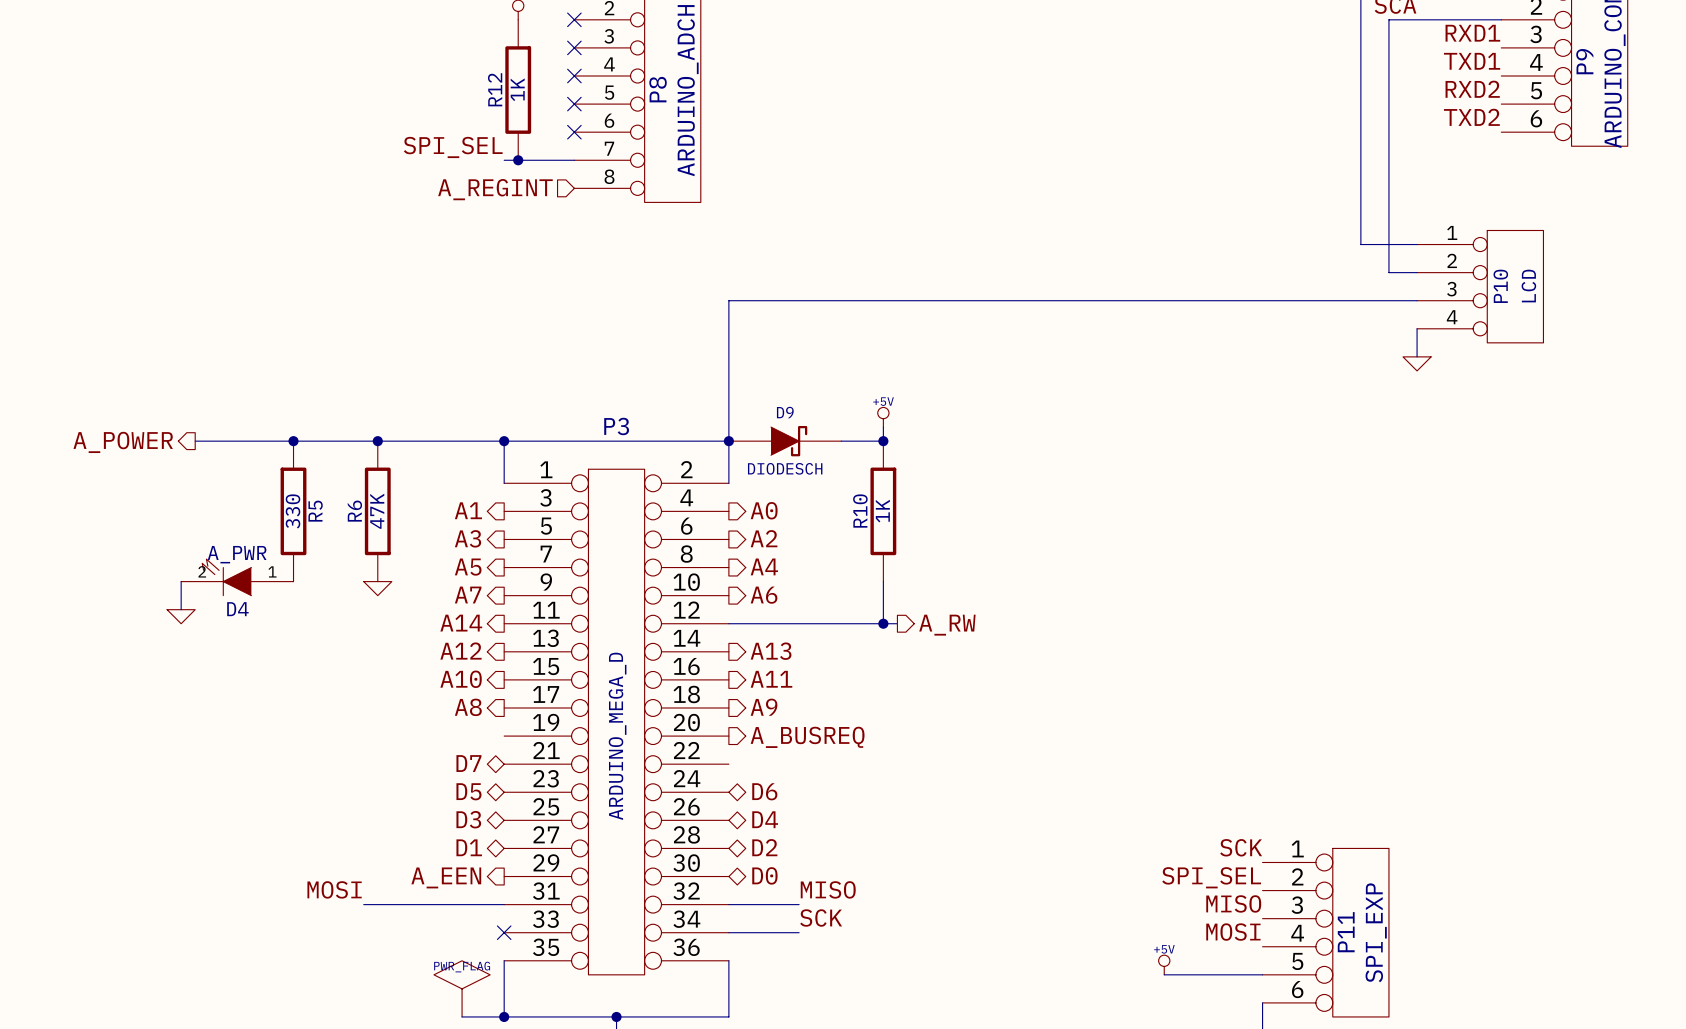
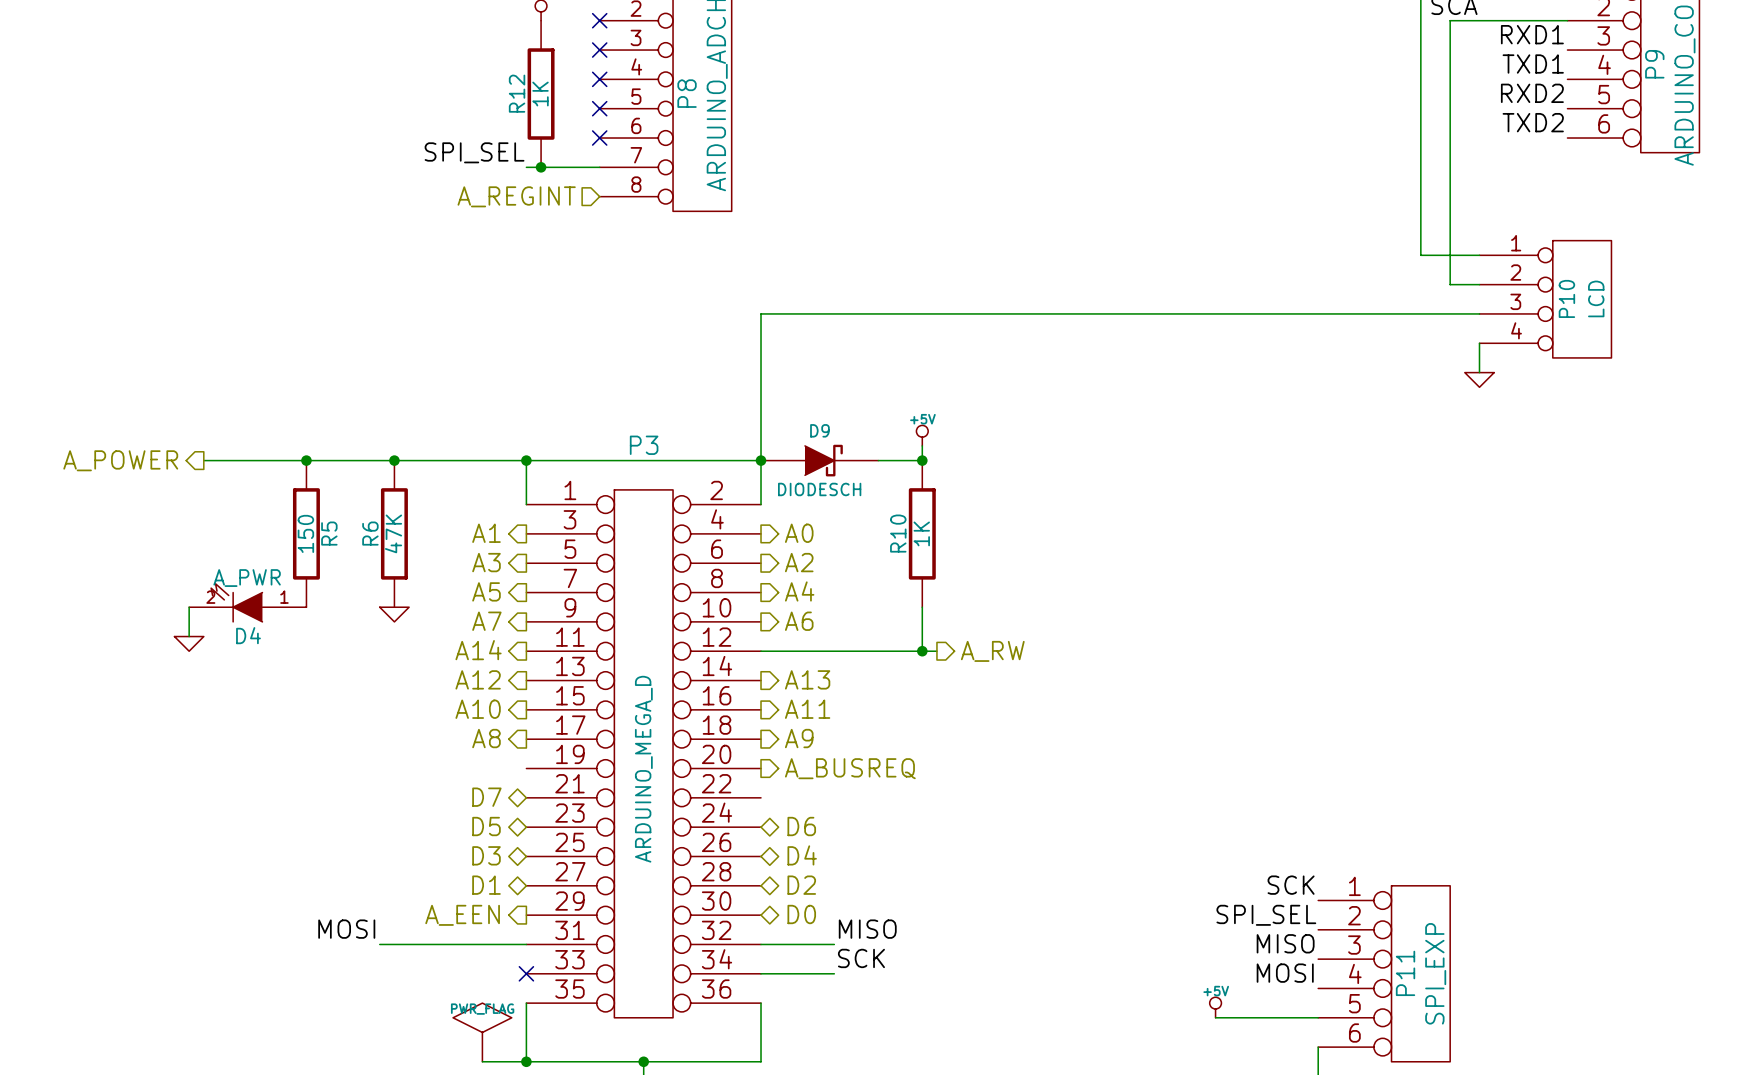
R5 value: 330 (292, 511) -> 150 (305, 533)

